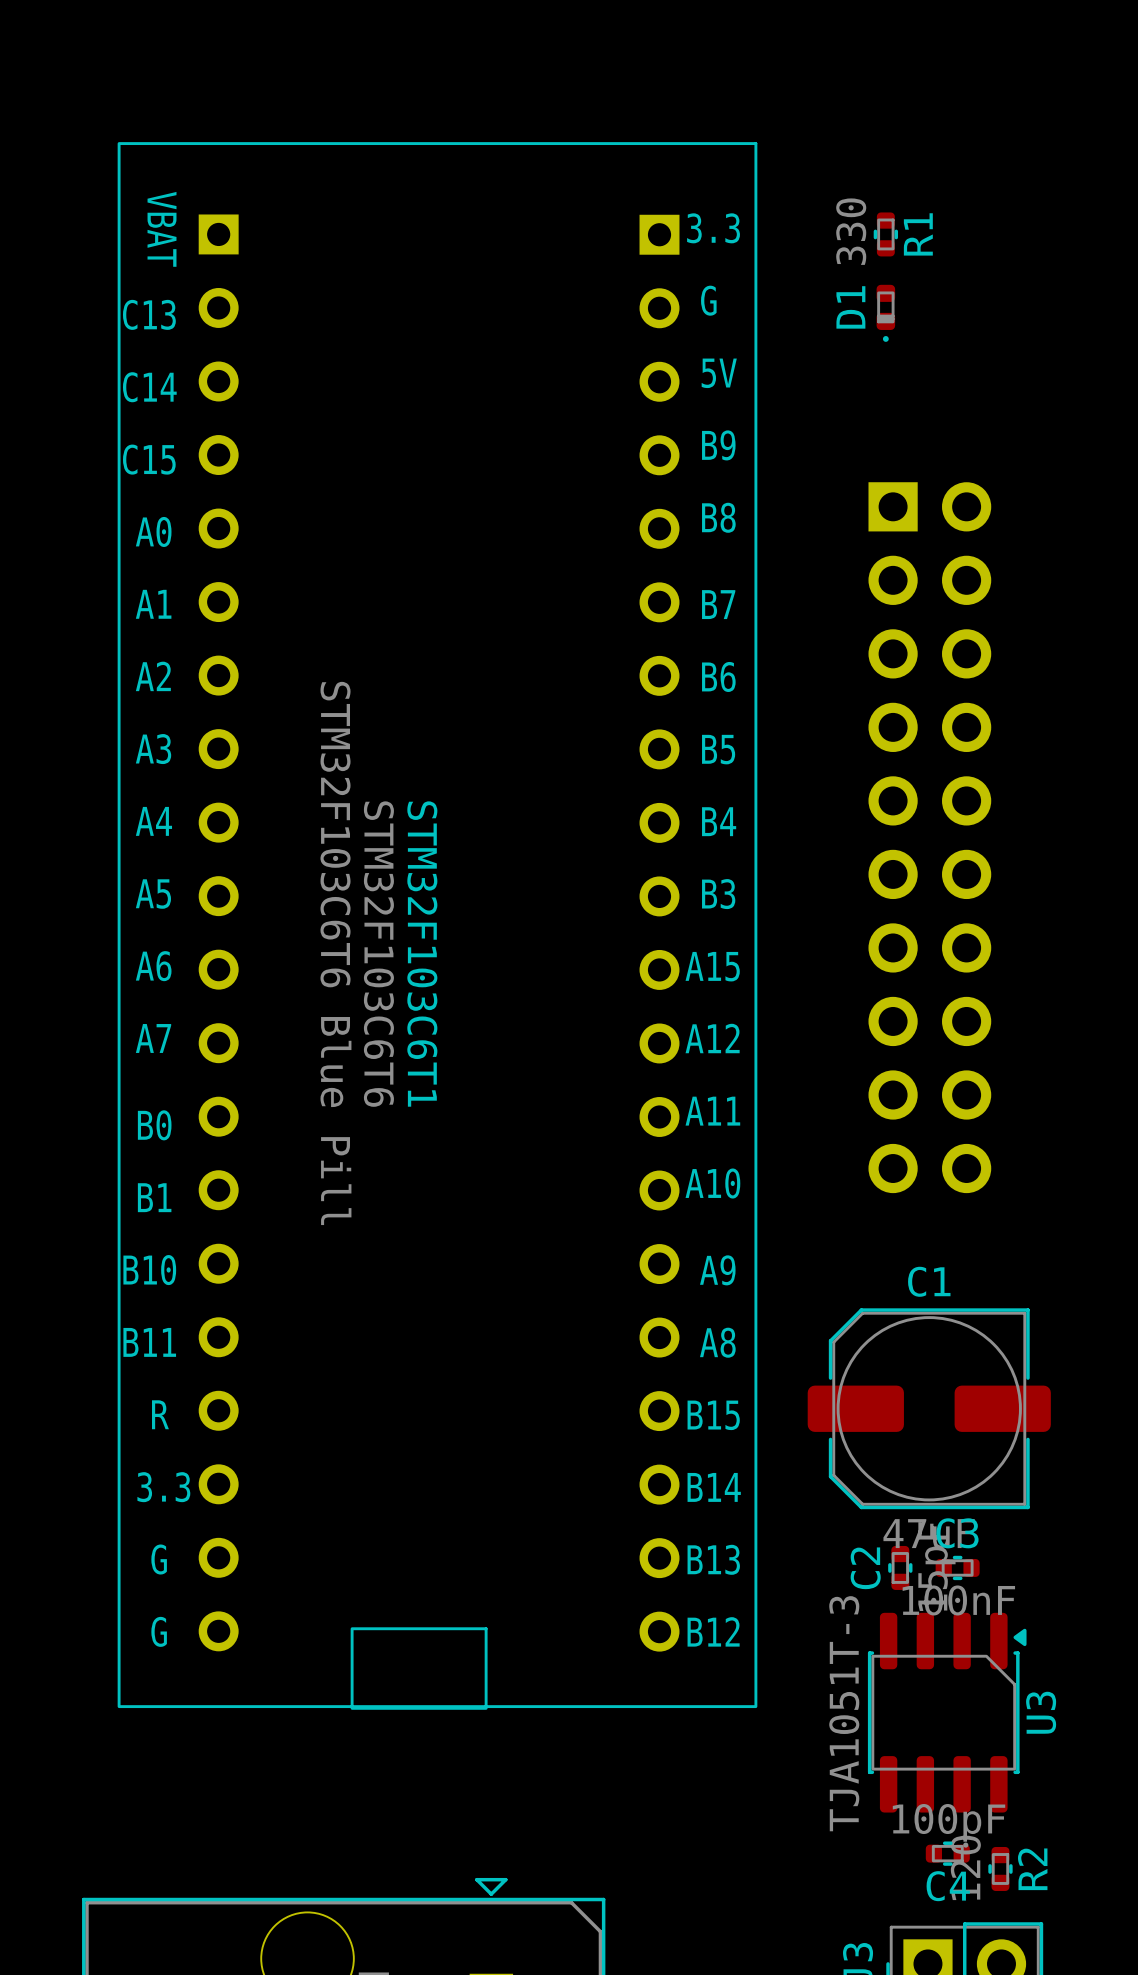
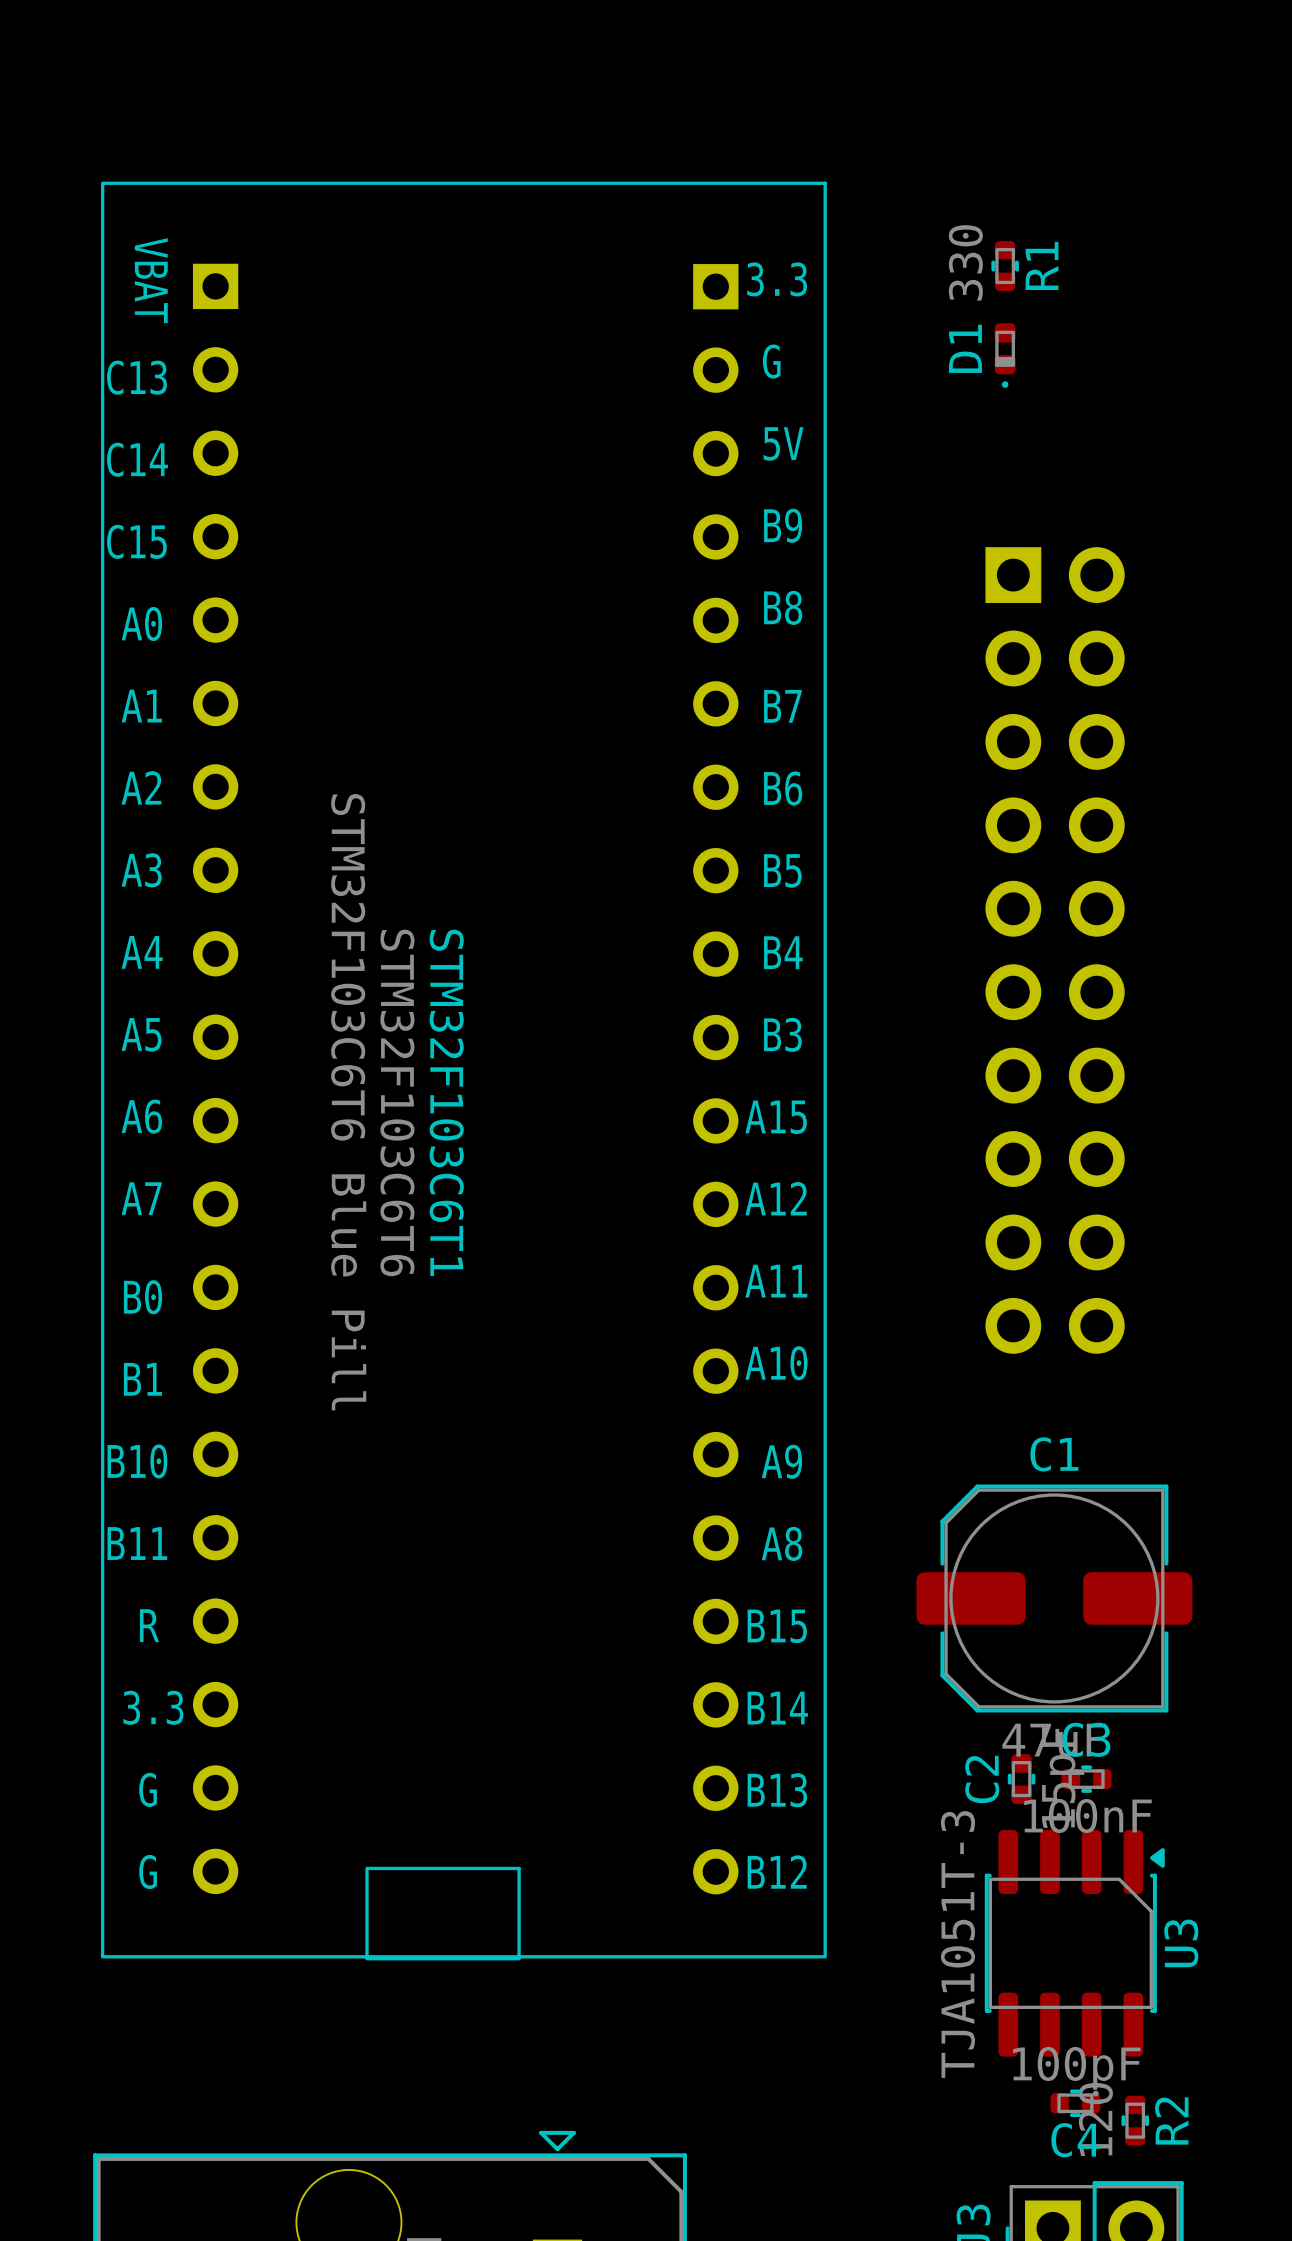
STM32F103C6T1 position: (437, 925) -> (463, 1071)

